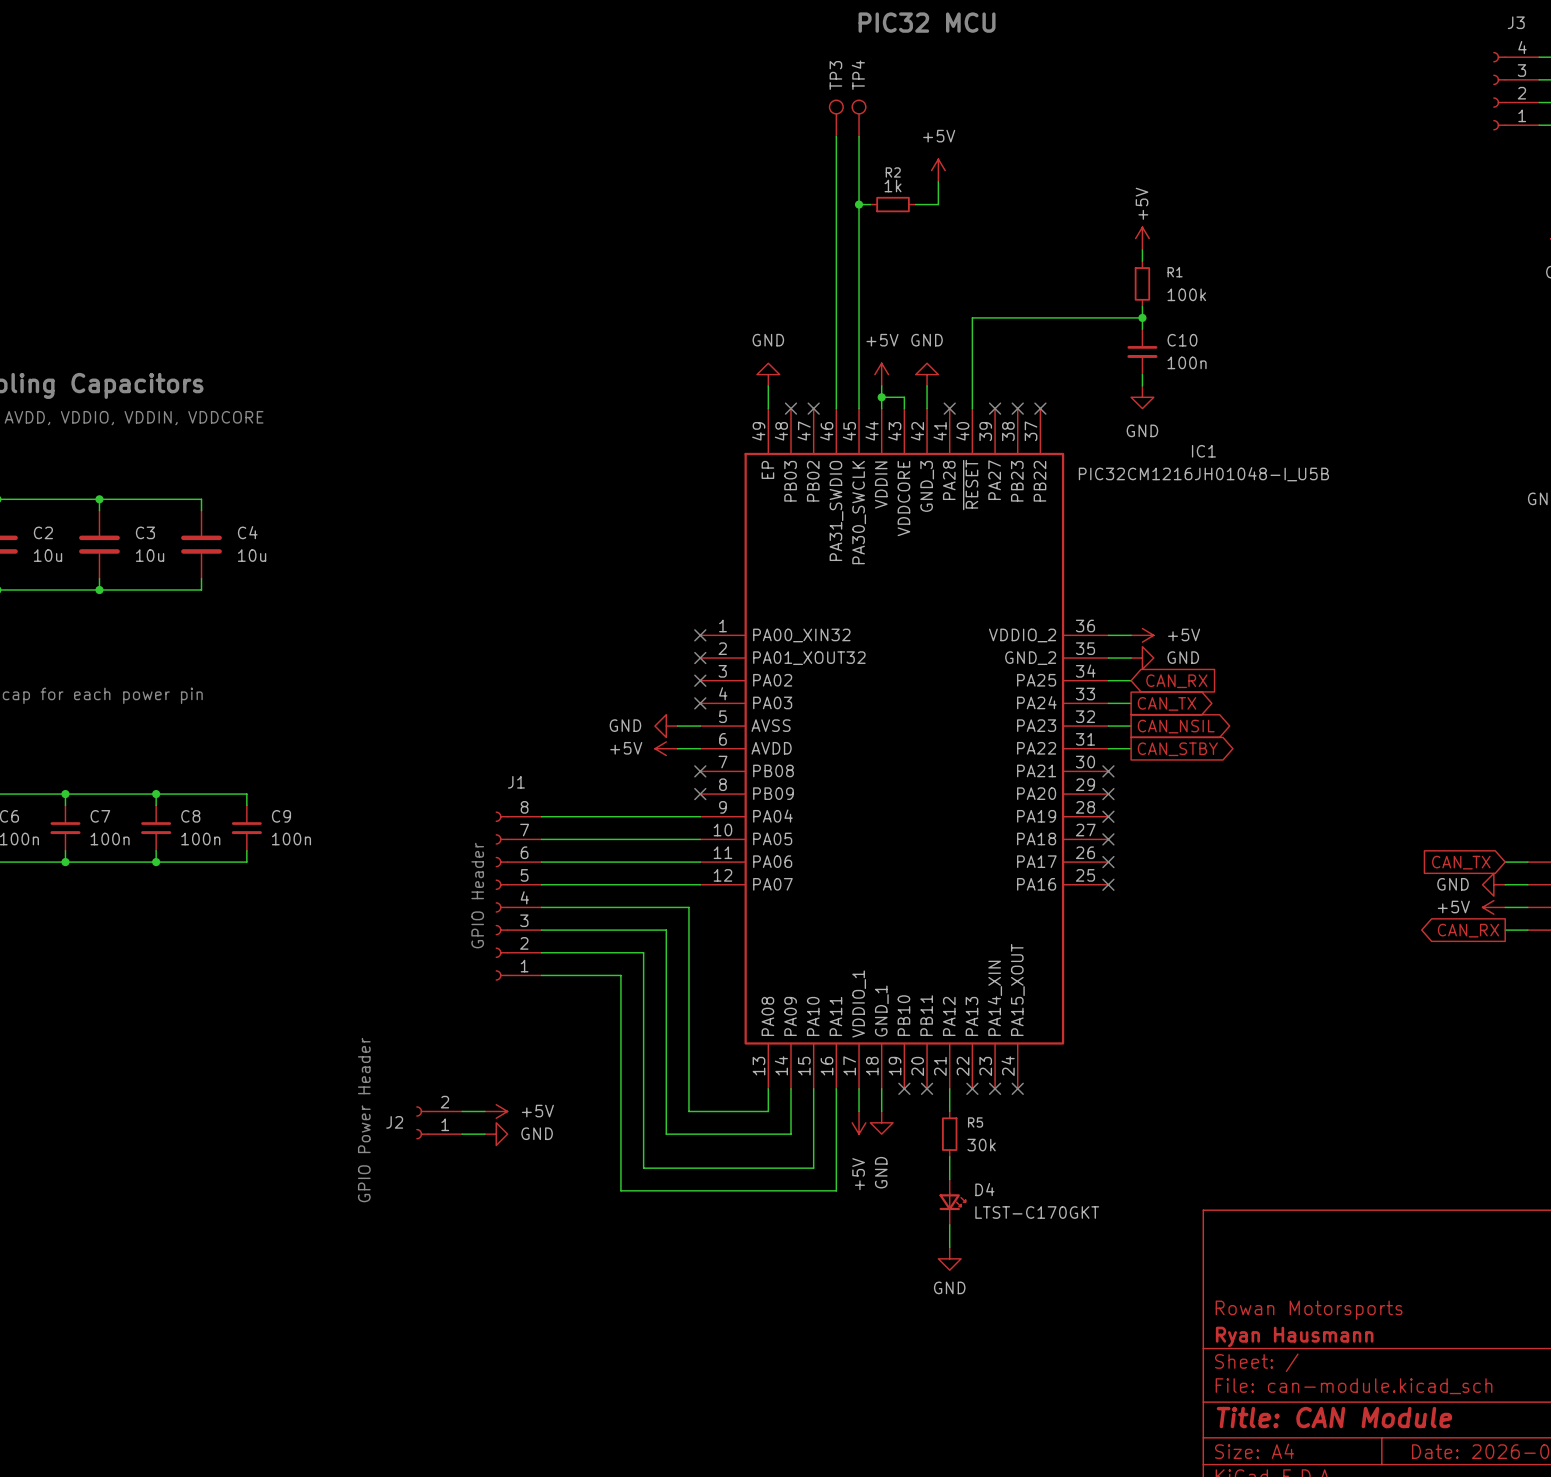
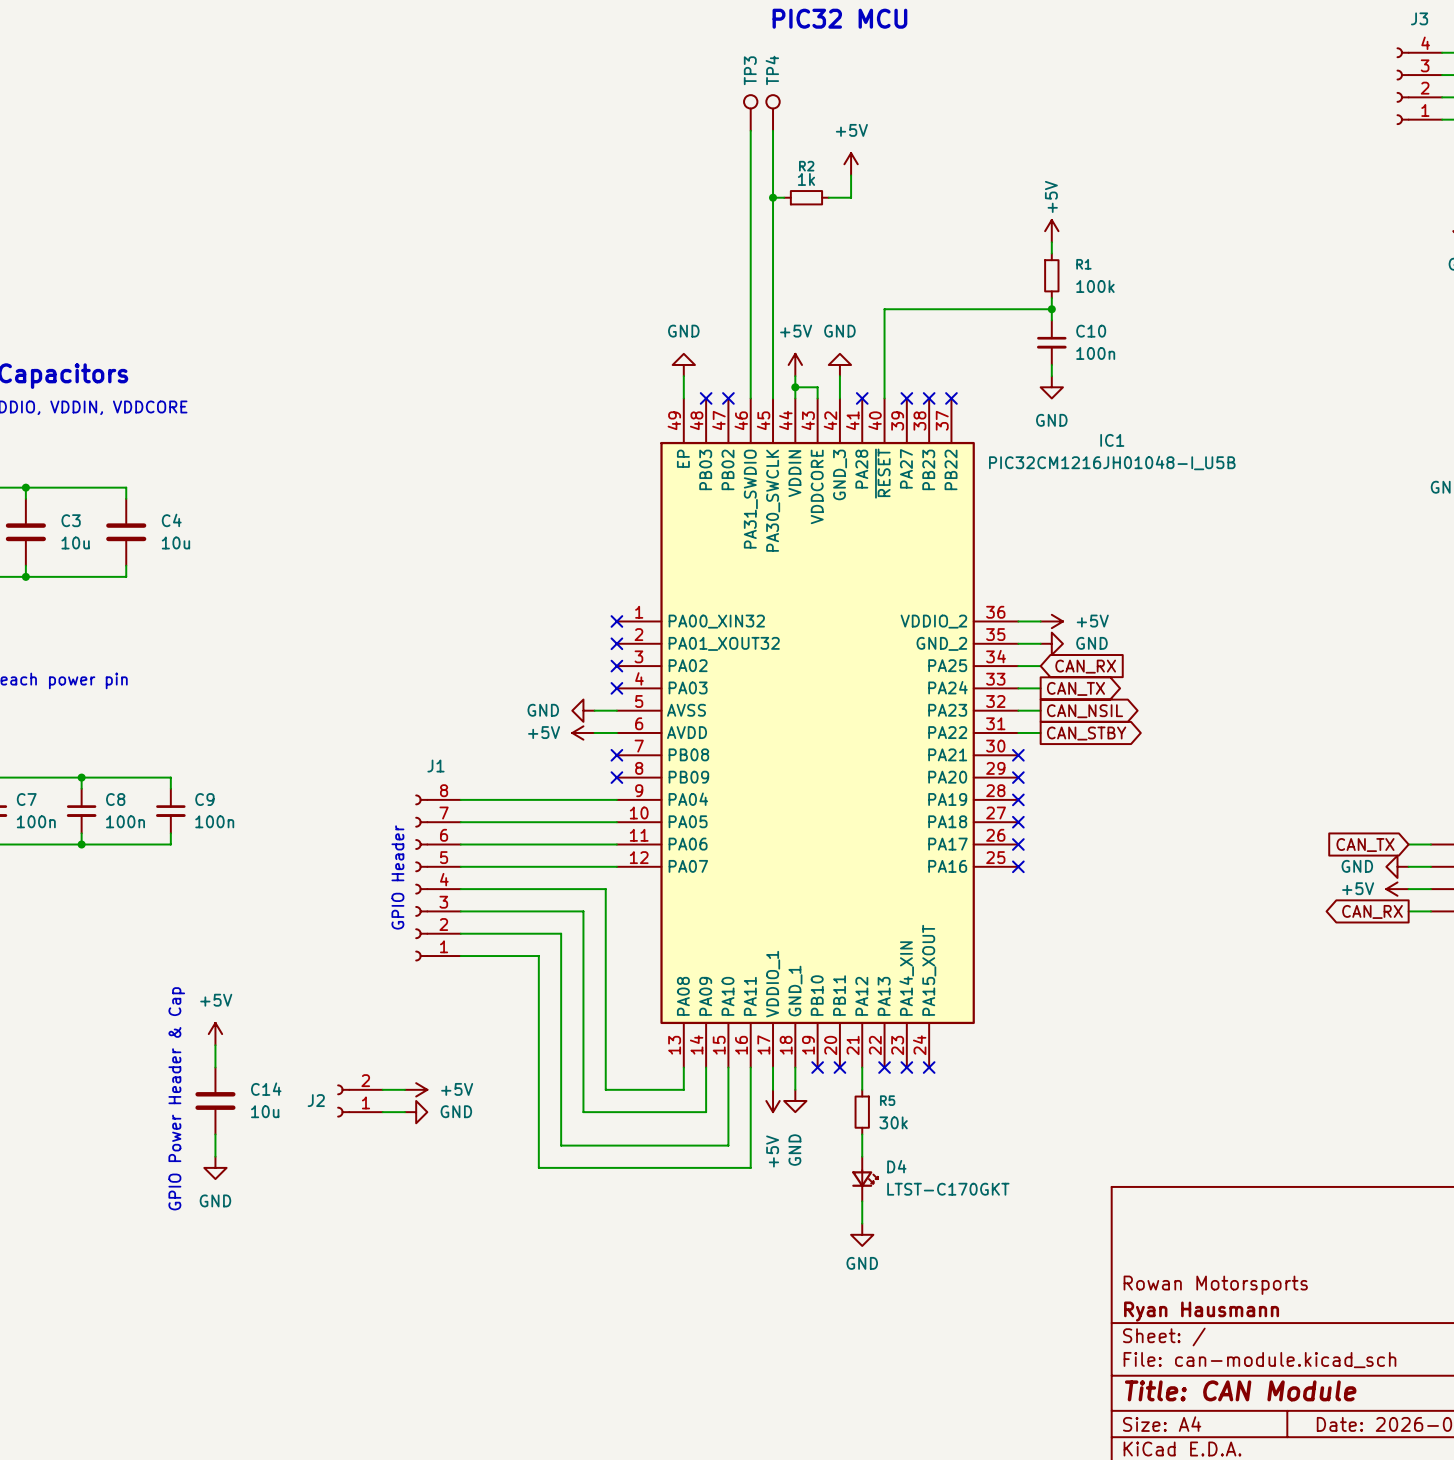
power symbol: none -> +5V (215, 1034)
wire: none -> (215, 1045) (215, 1067)
text: none -> GPIO Power Header & Cap (176, 1098)
text: GPIO Power Header (364, 1120) -> none
C14: none -> 10u (215, 1100)
wire: none -> (215, 1134) (215, 1156)
power symbol: none -> GND (215, 1167)

